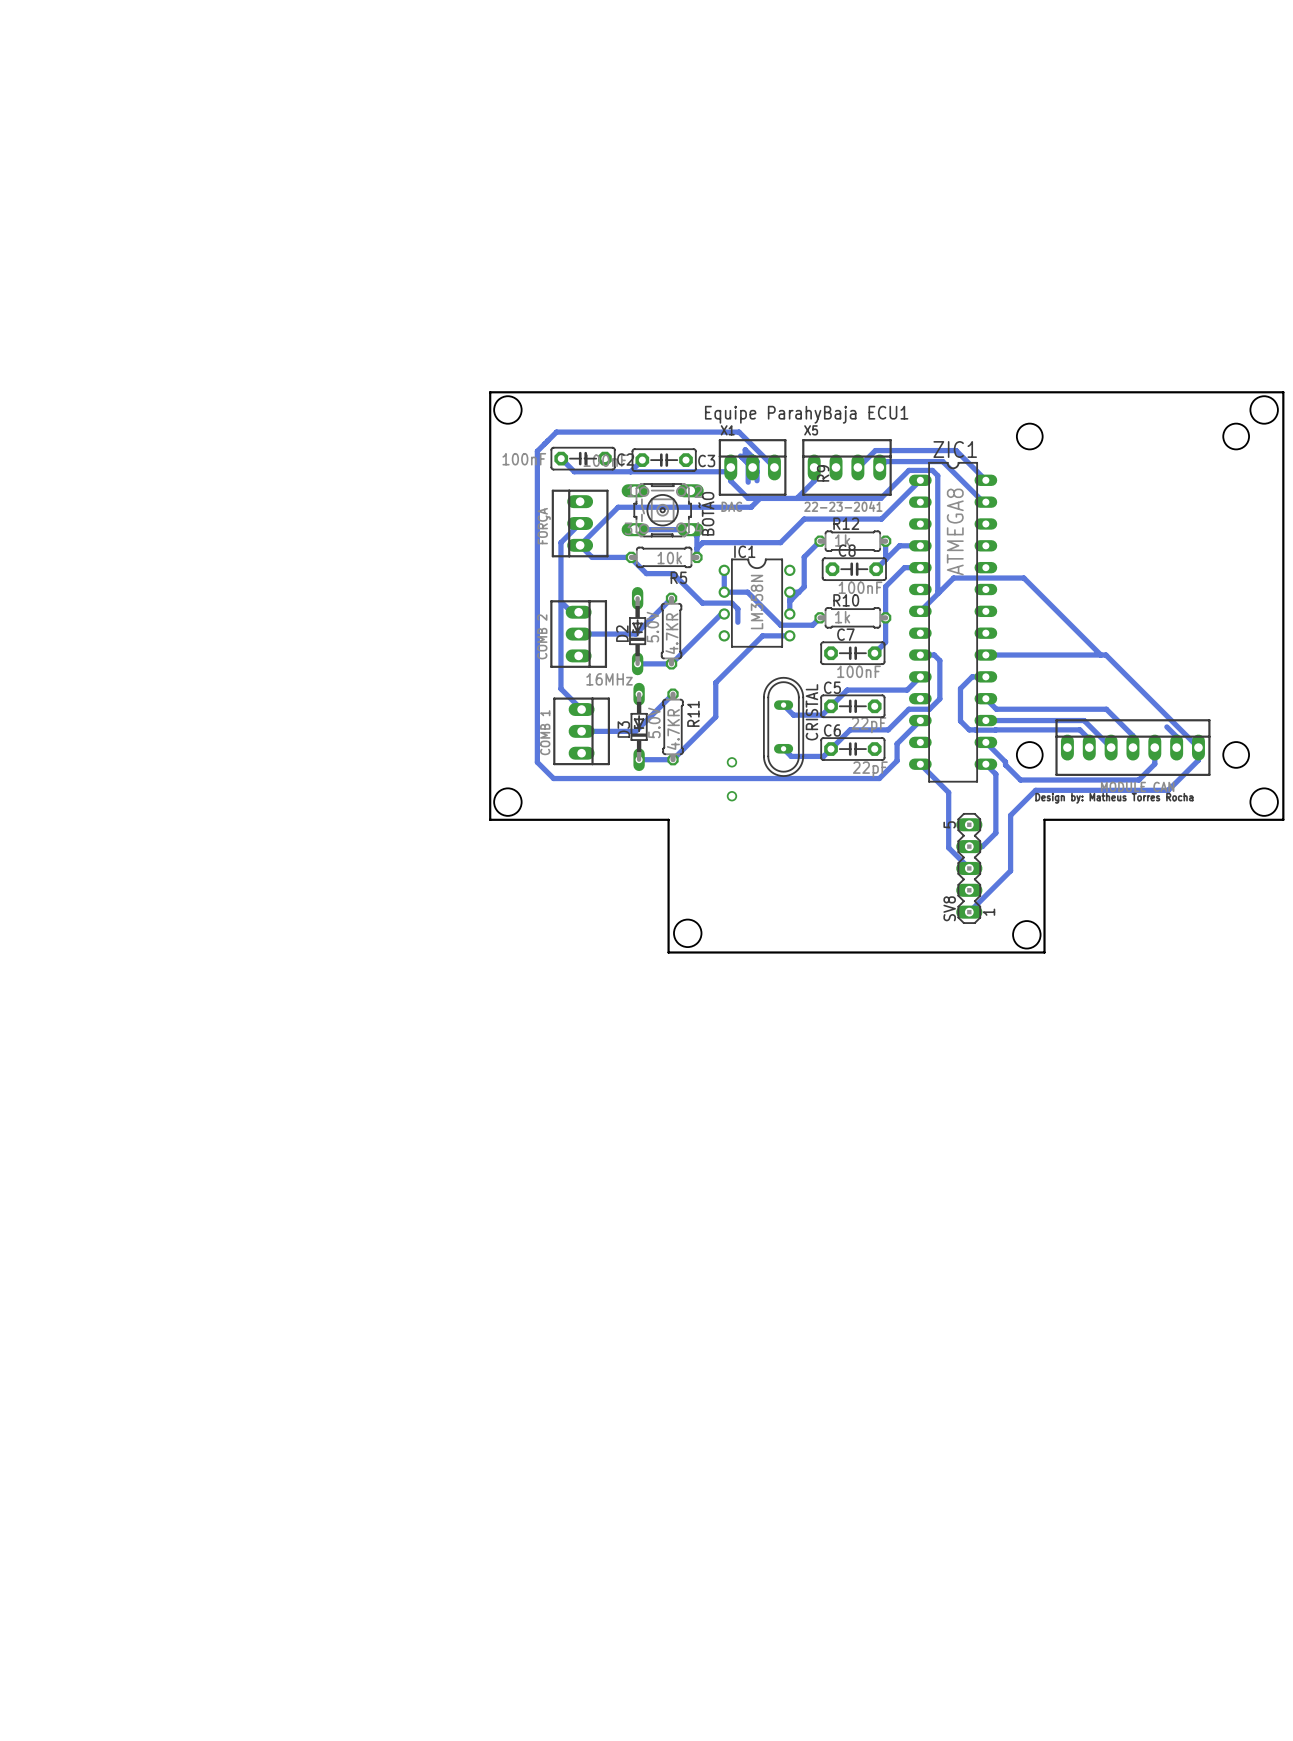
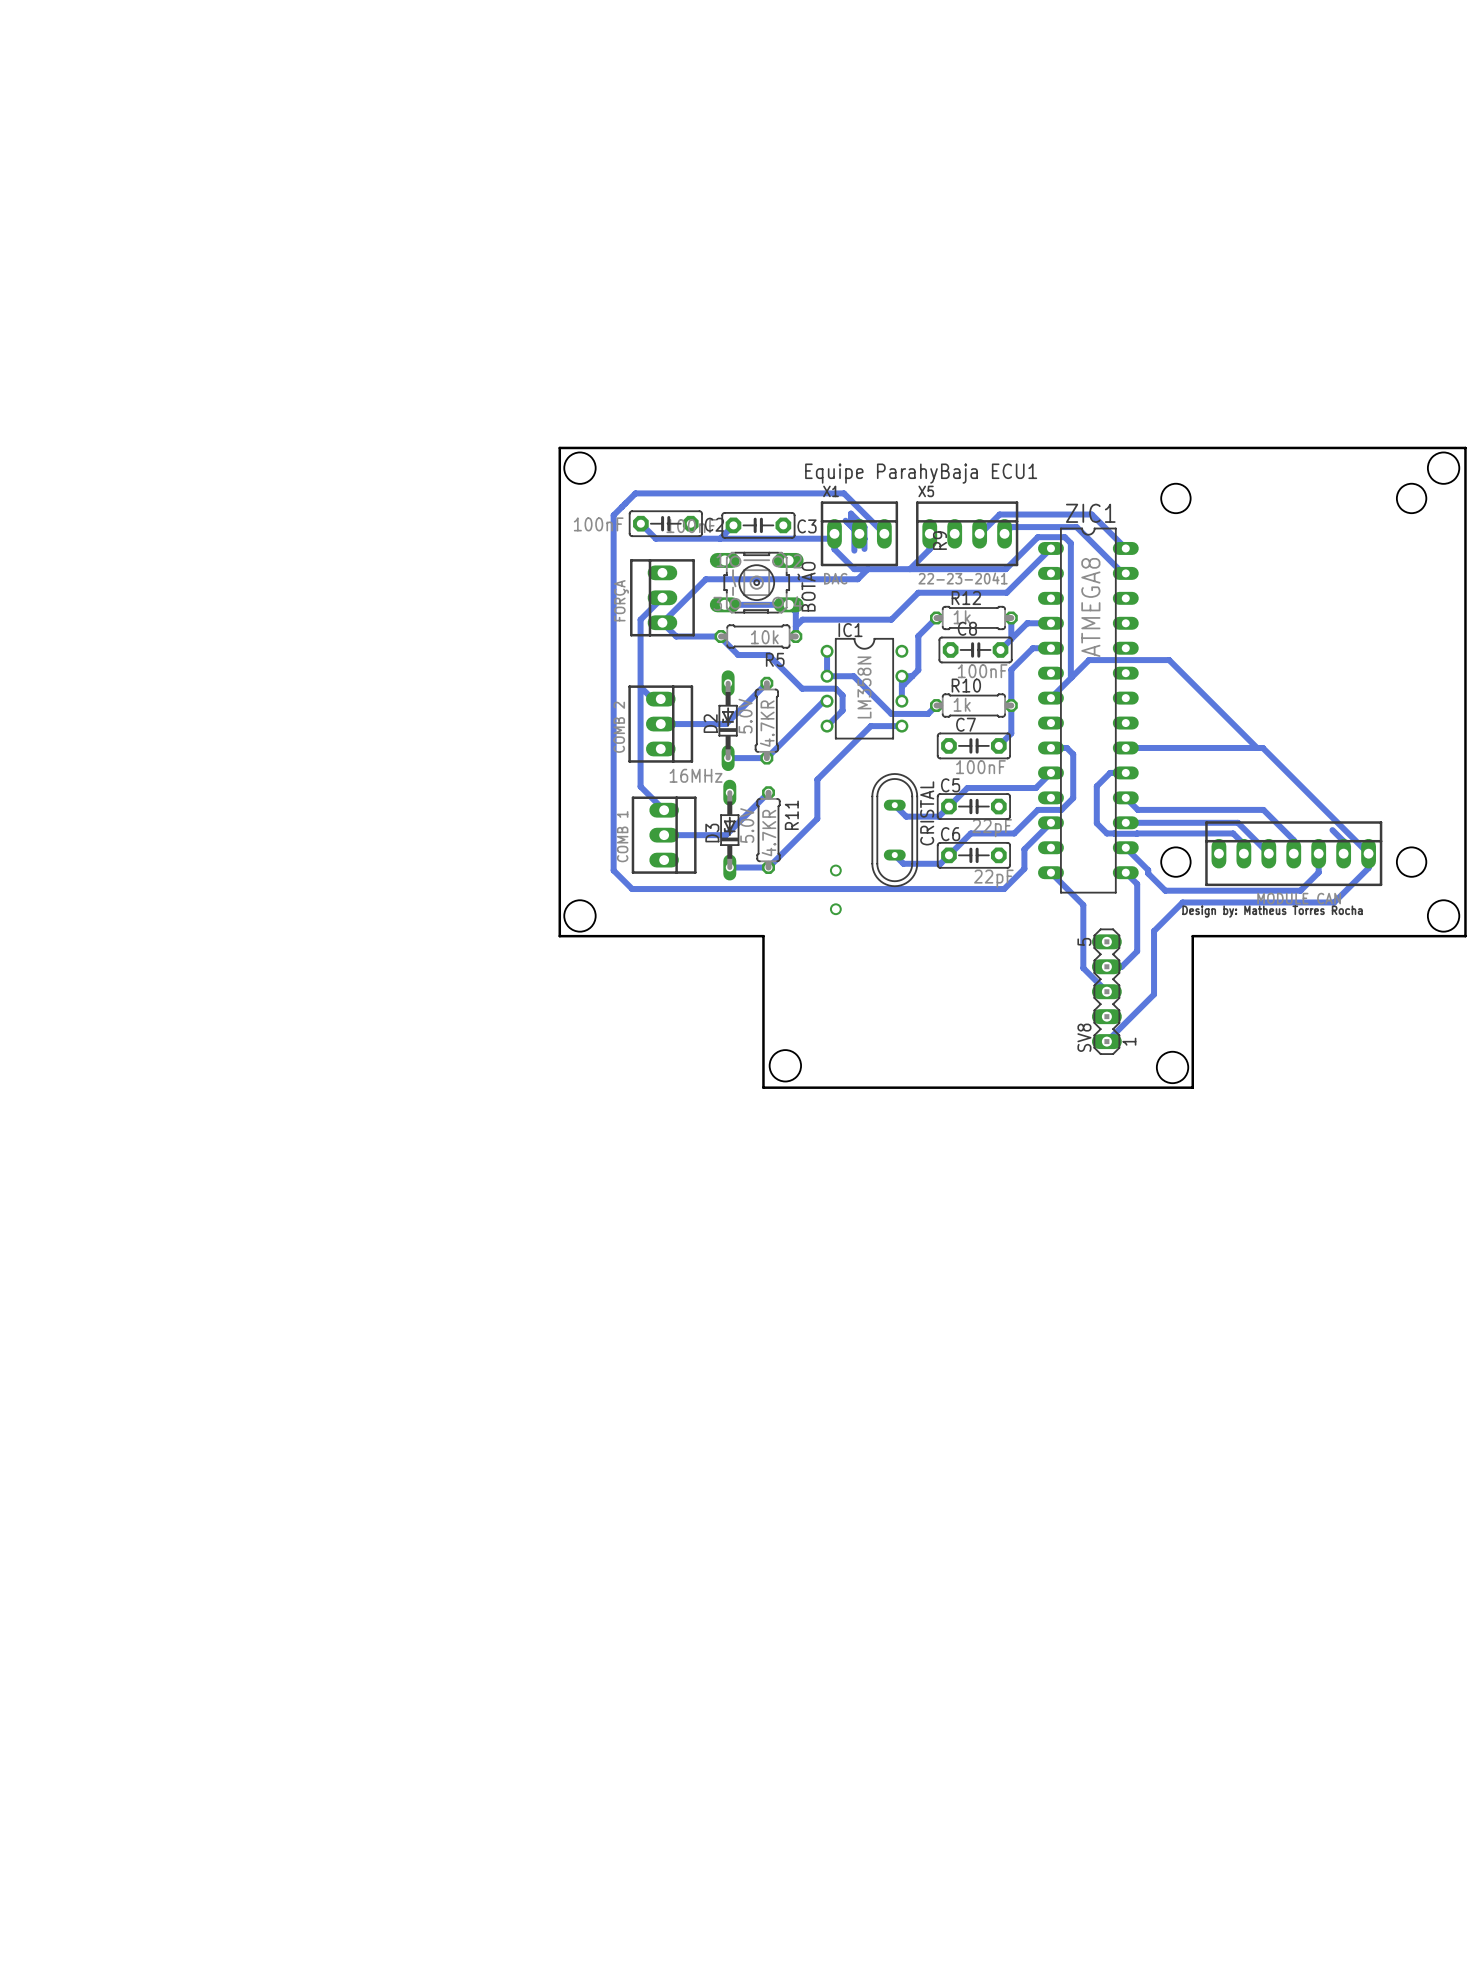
bottom track: none -> (842, 710) (827, 726)

